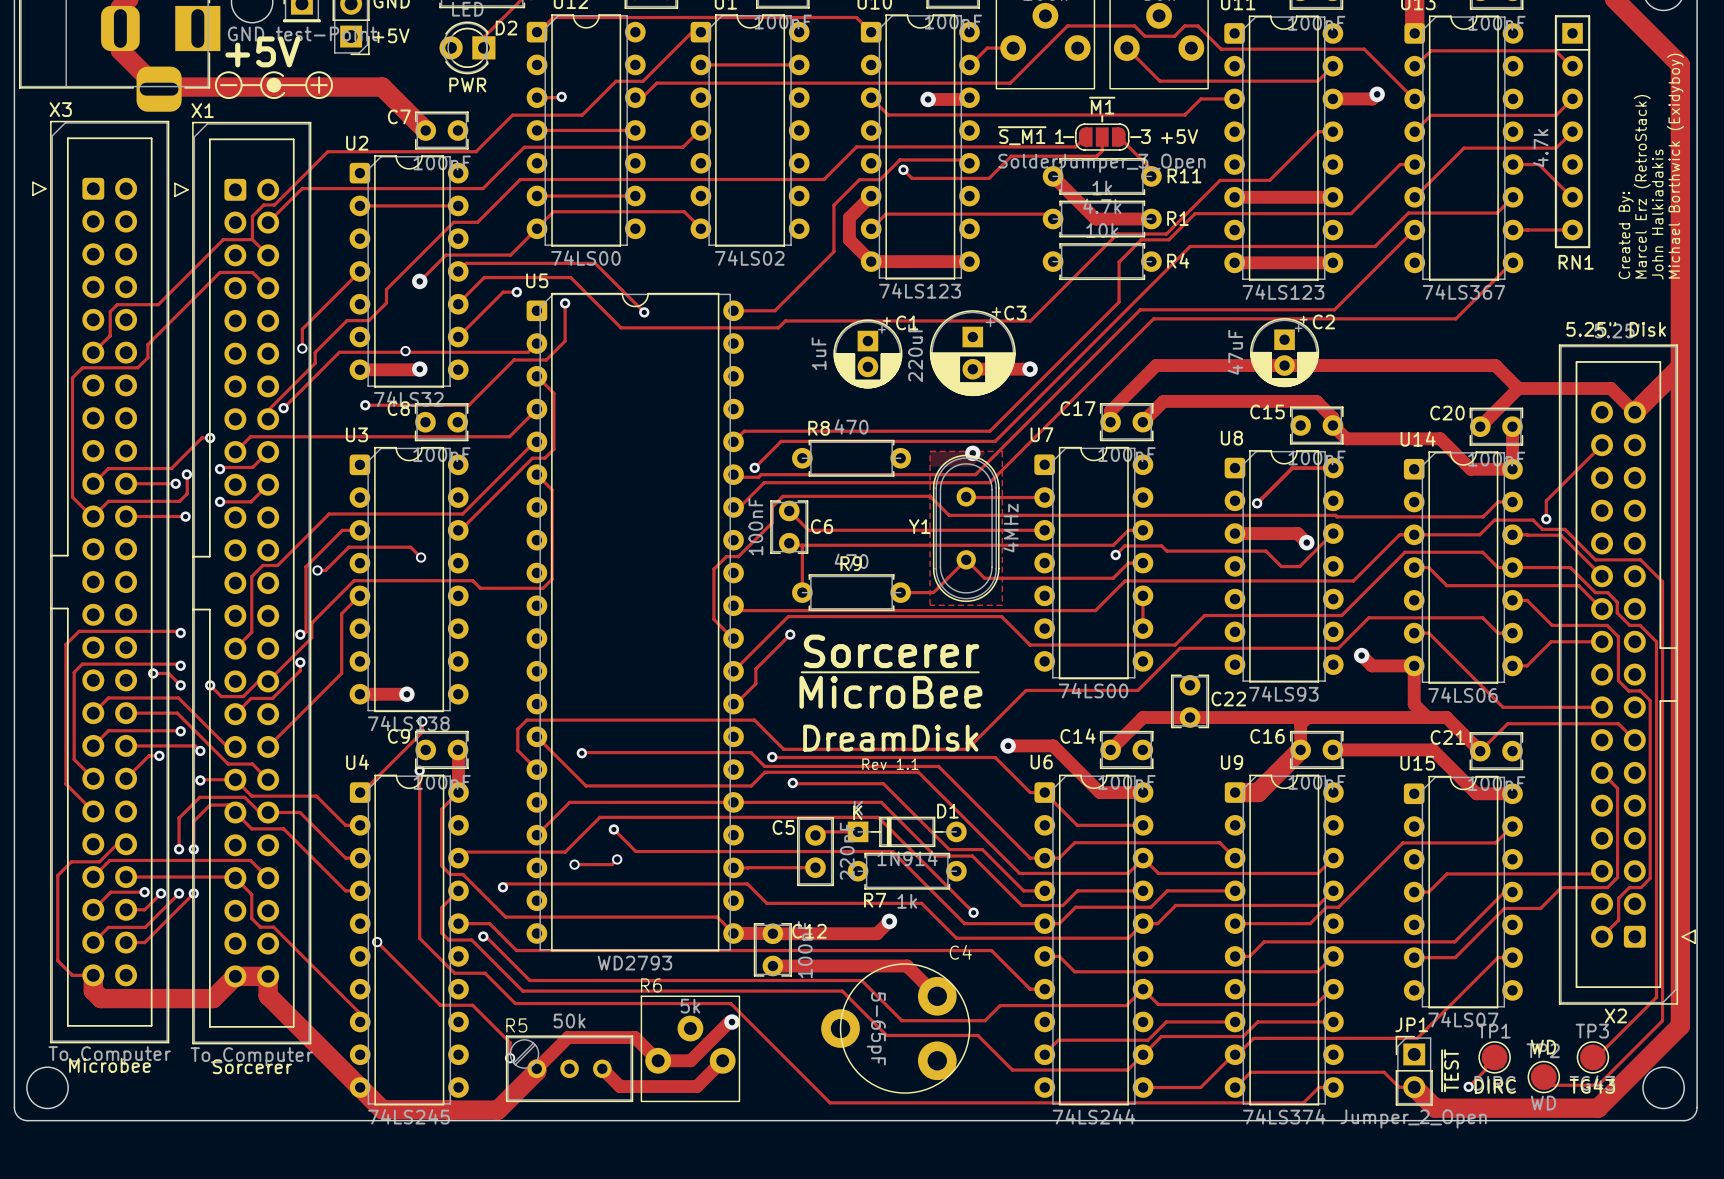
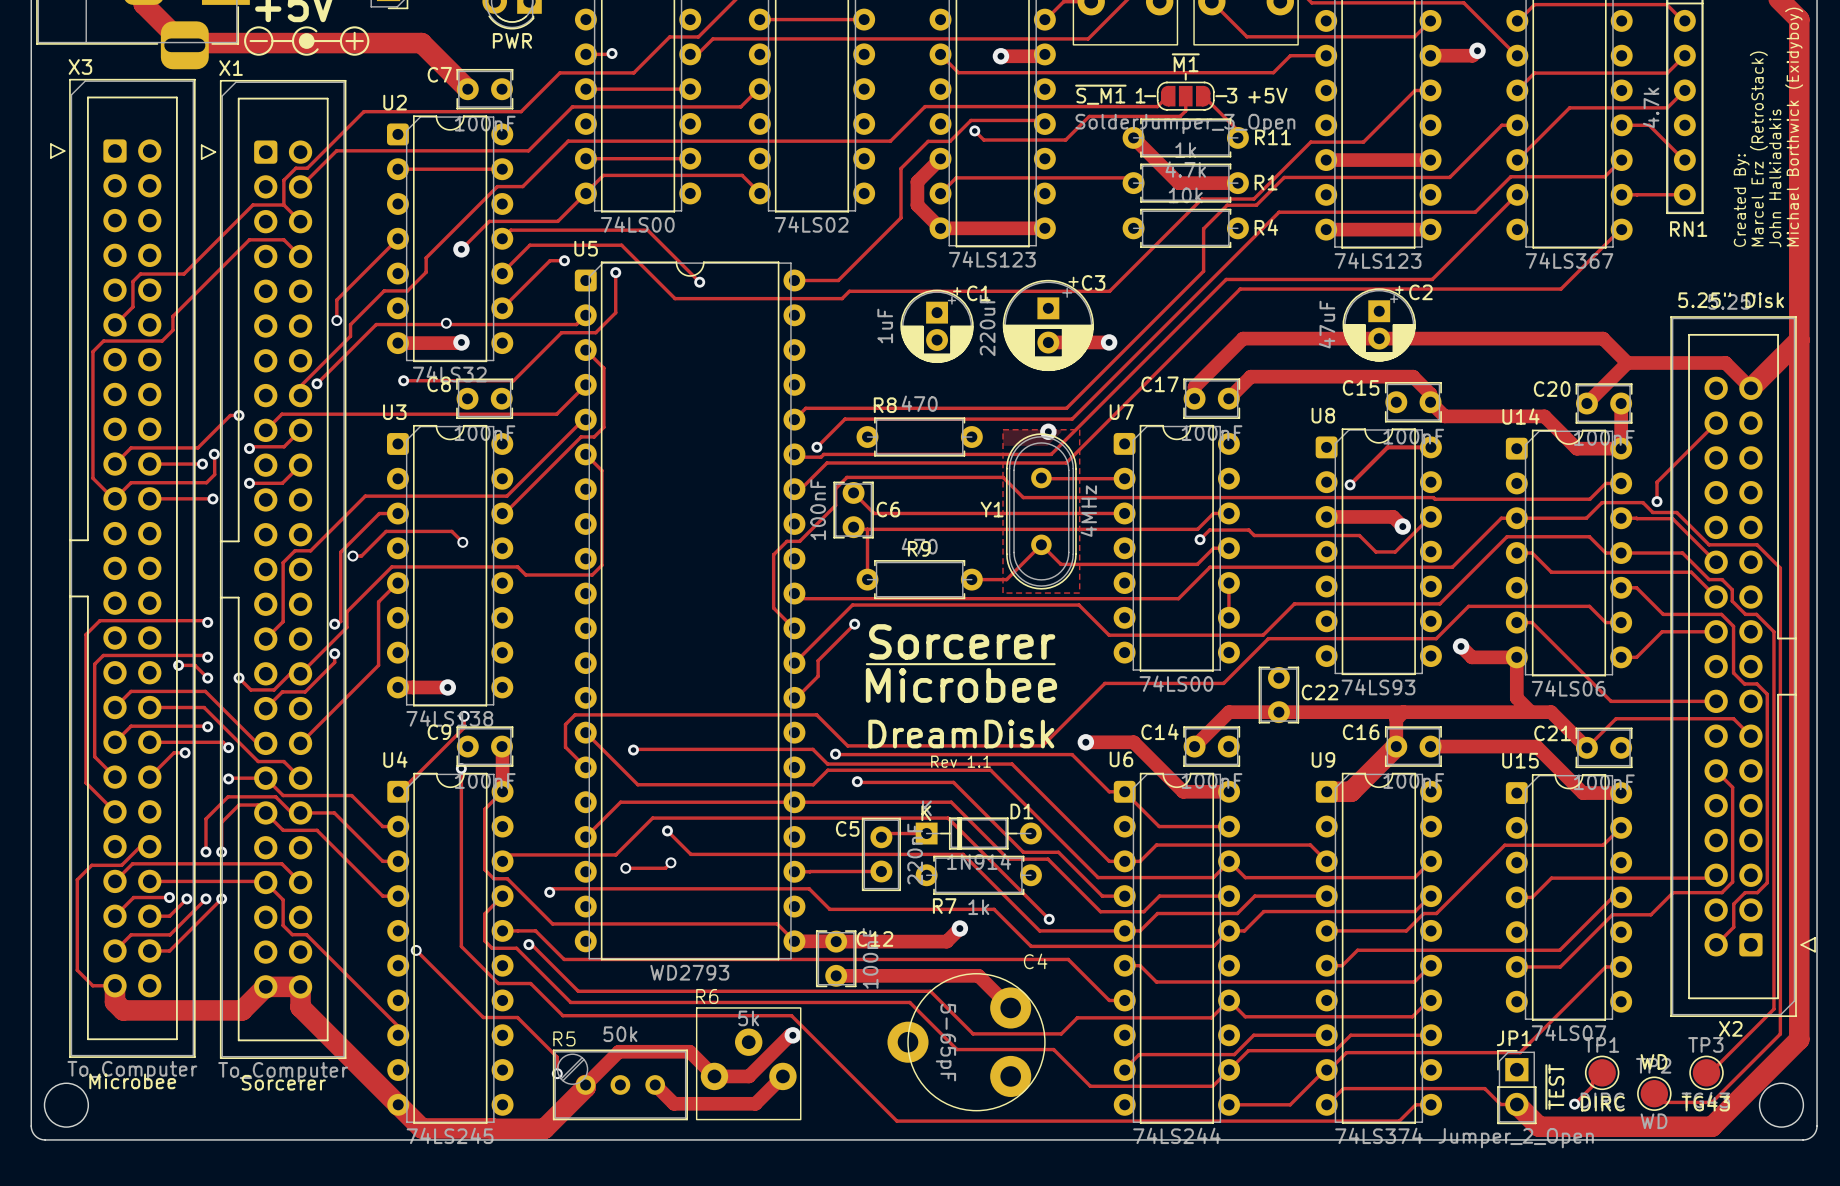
text: MicroBee (890, 692) -> Microbee (961, 685)

